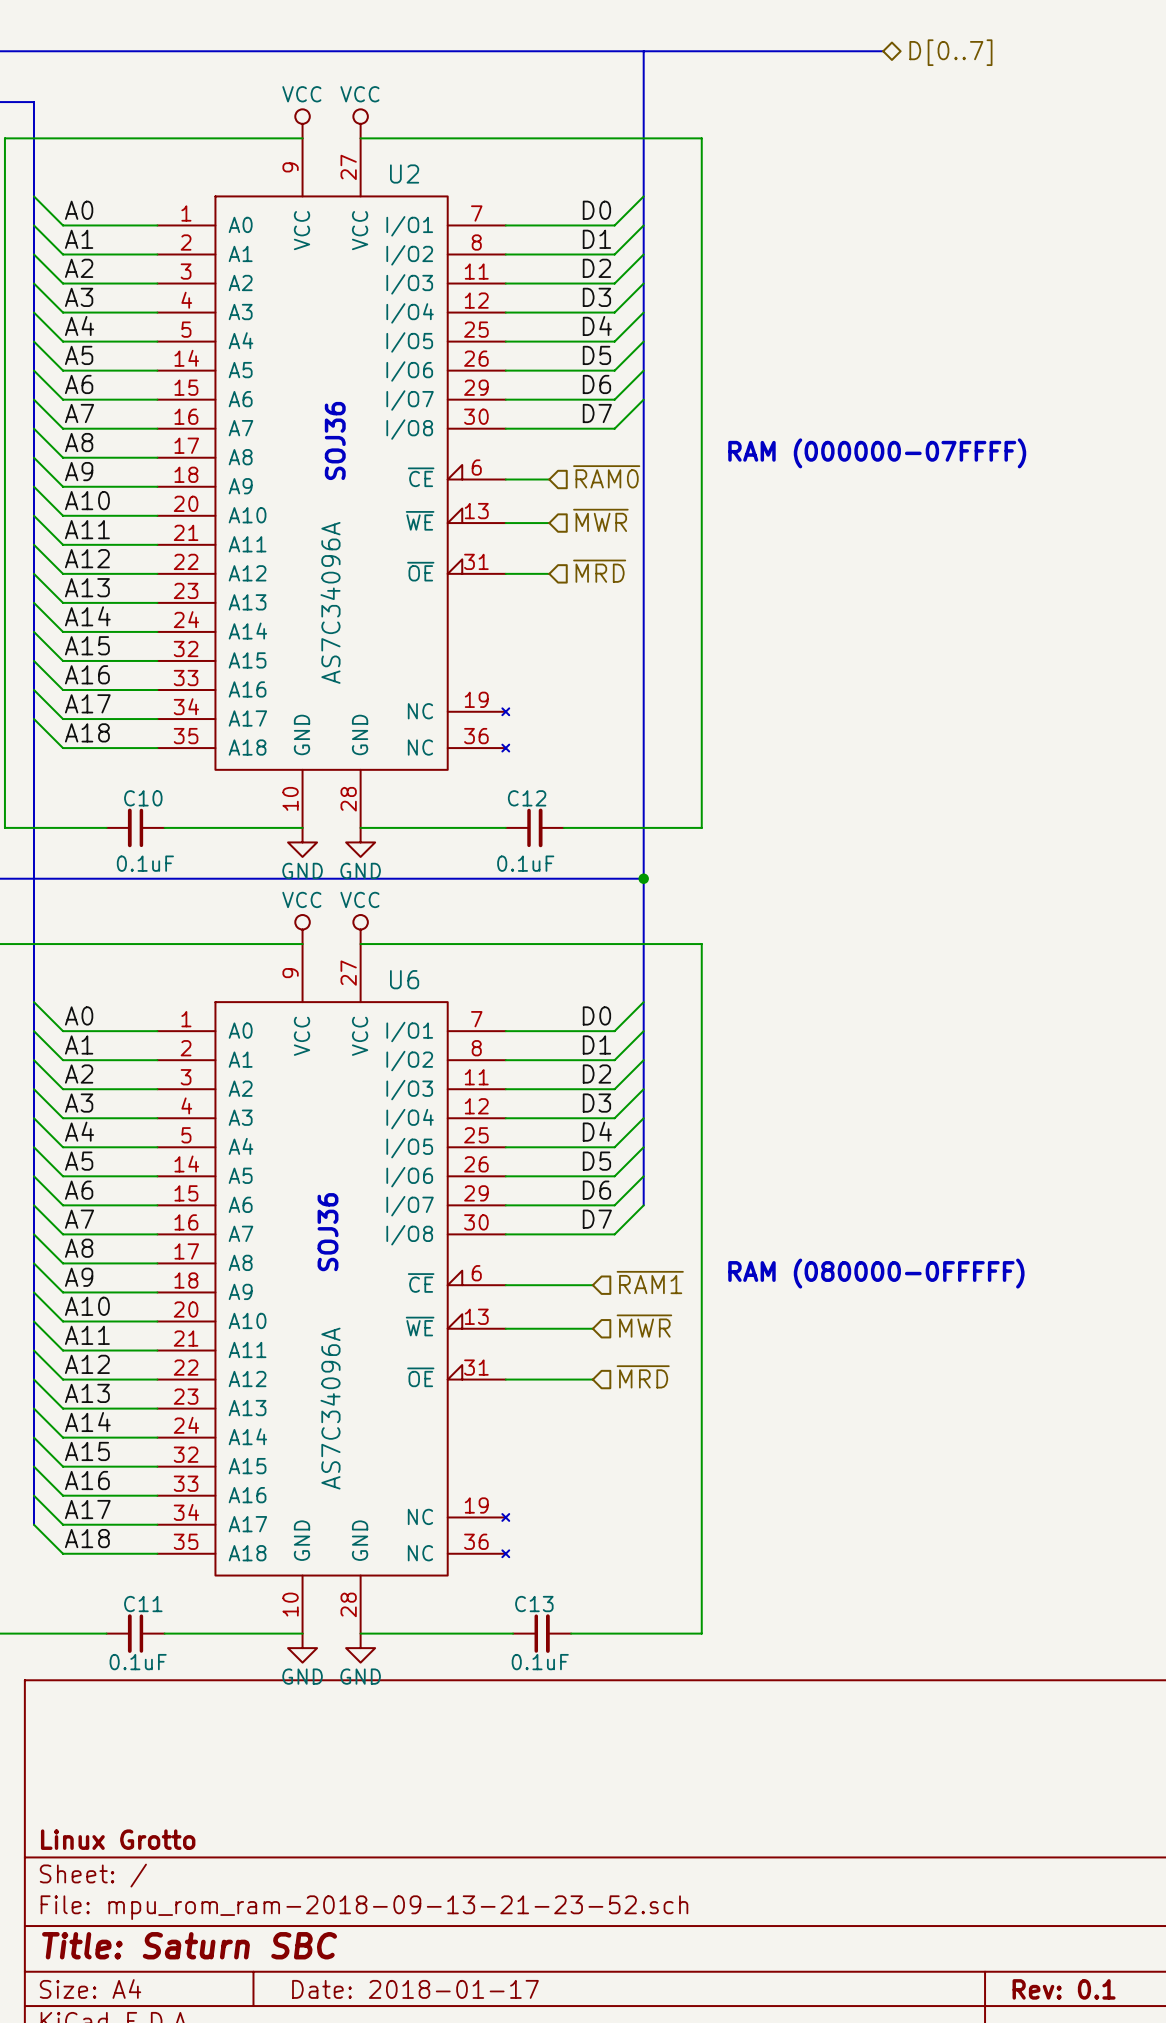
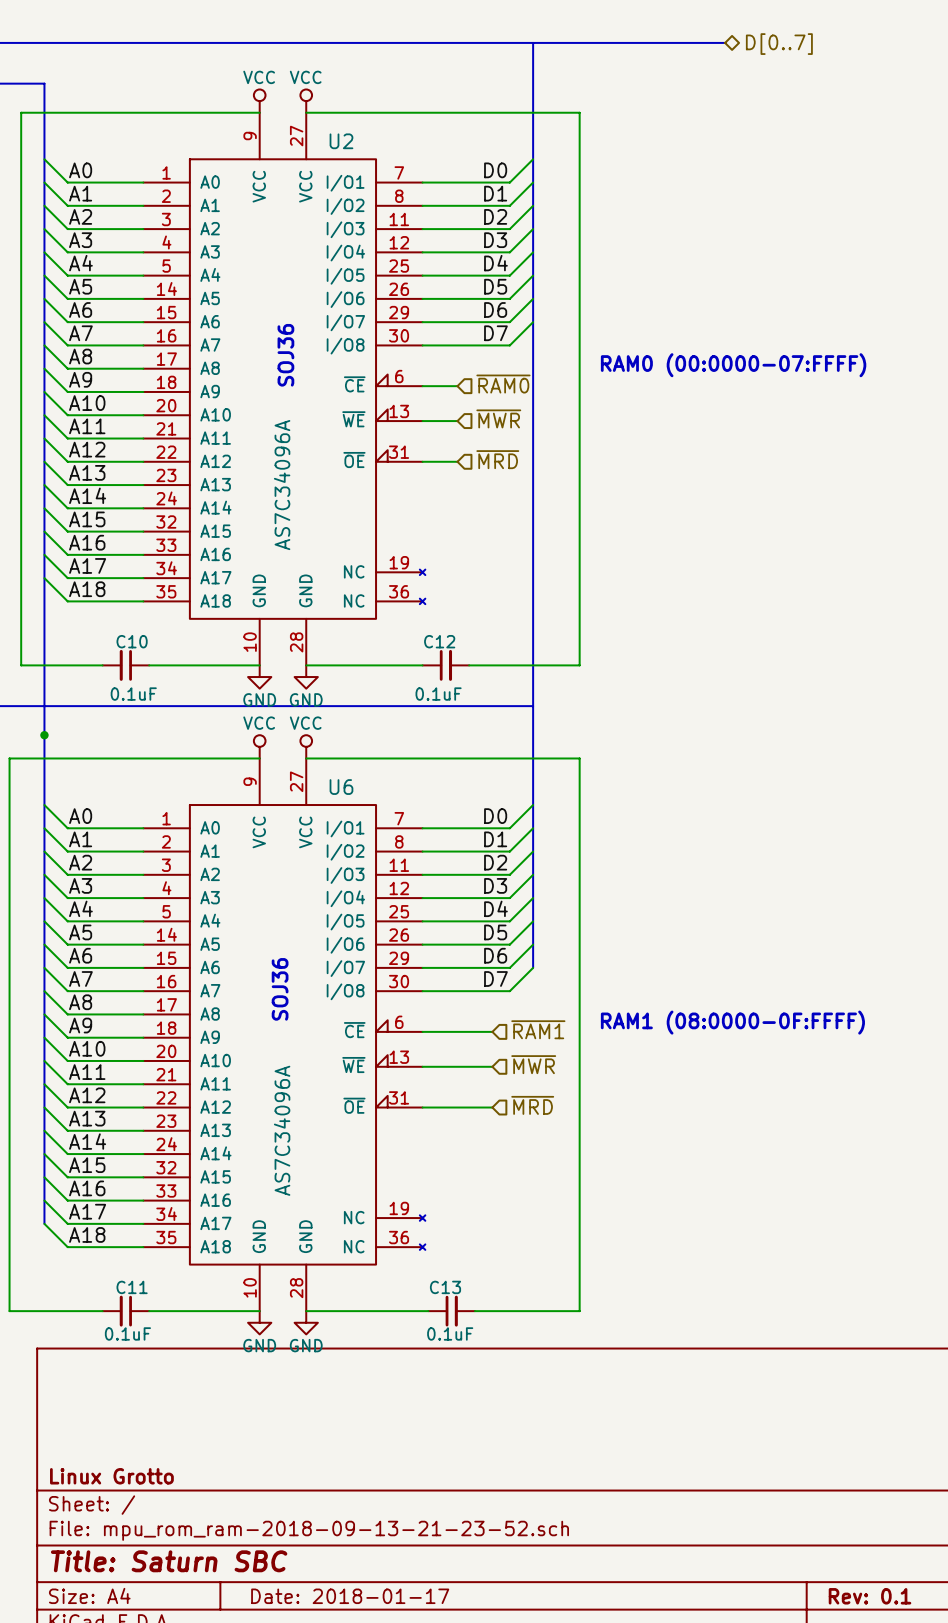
text: RAM (000000-07FFFF) (877, 453) -> RAM0 (00:0000-07:FFFF) (733, 365)
junction: (643, 878) -> none
junction: none -> (44, 735)
text: RAM (080000-0FFFFF) (876, 1273) -> RAM1 (08:0000-0F:FFFF) (732, 1022)

